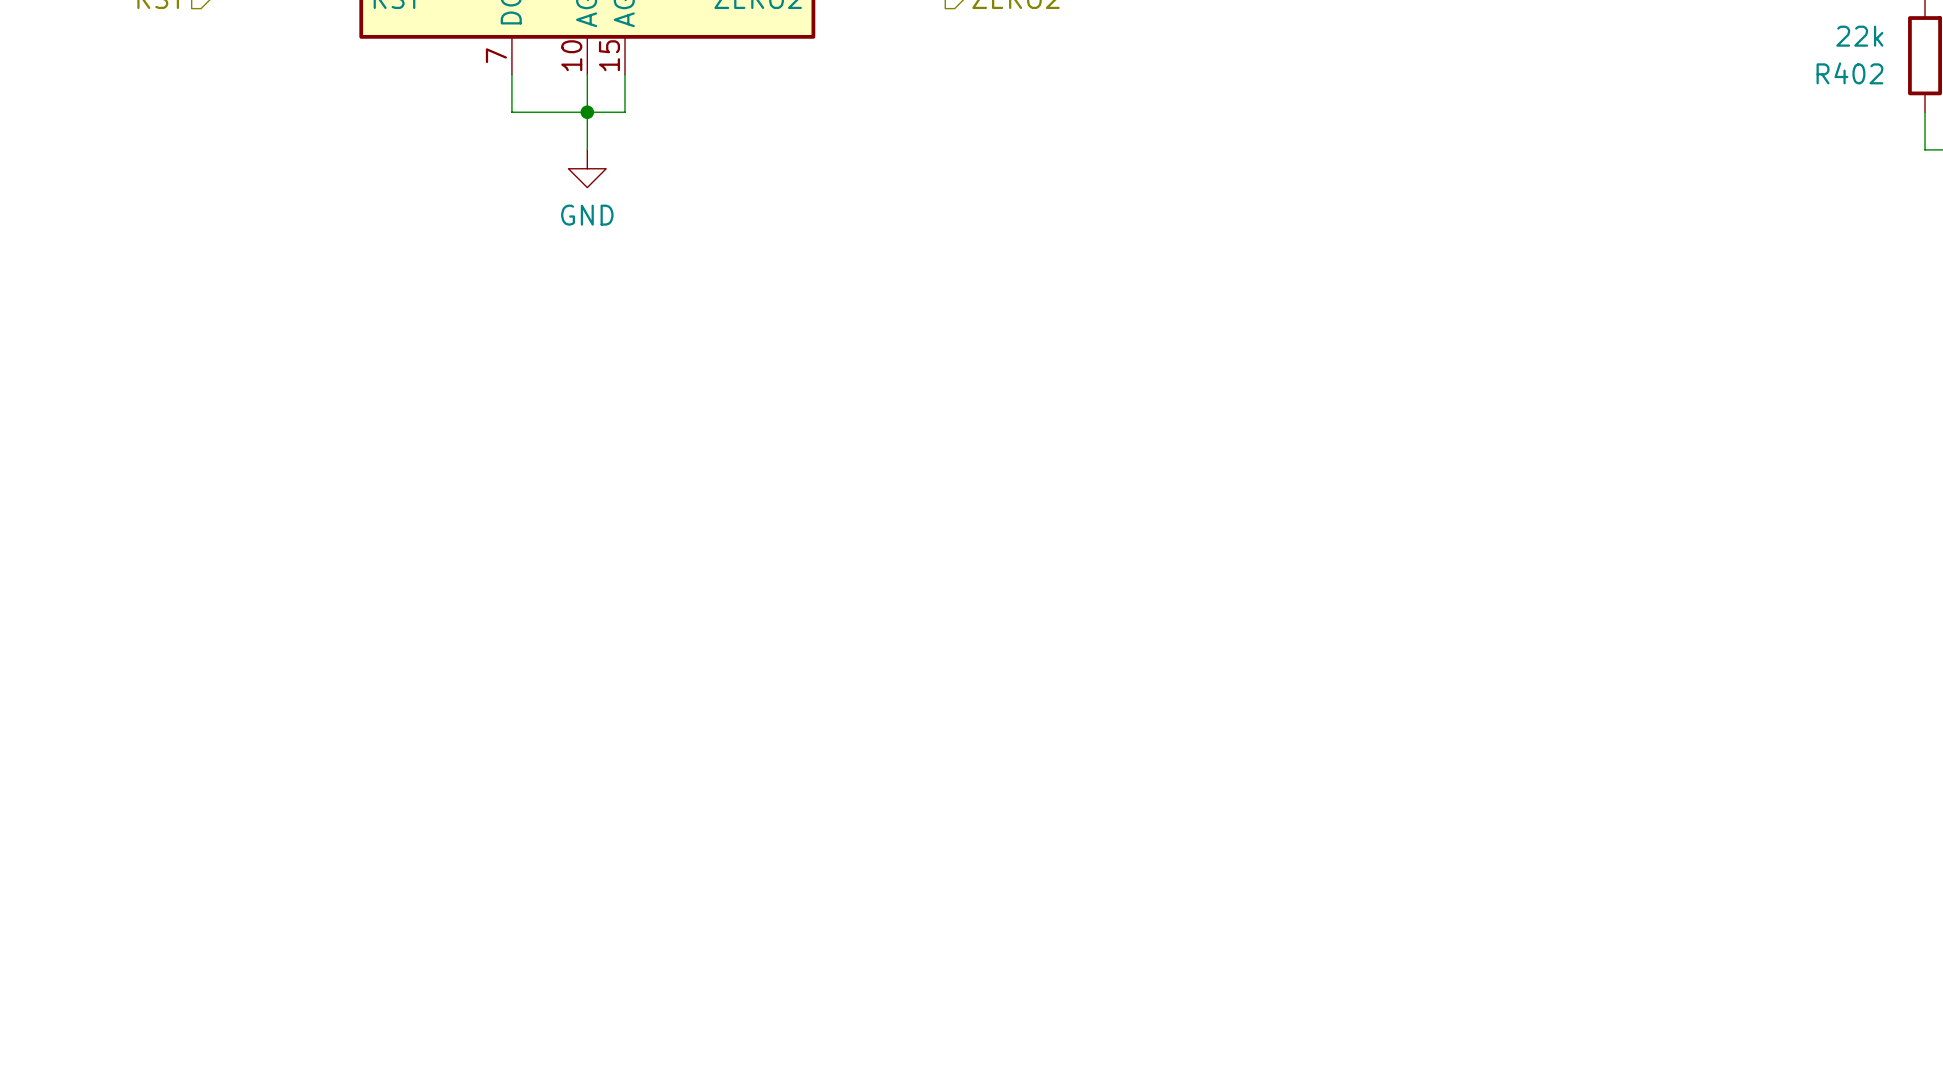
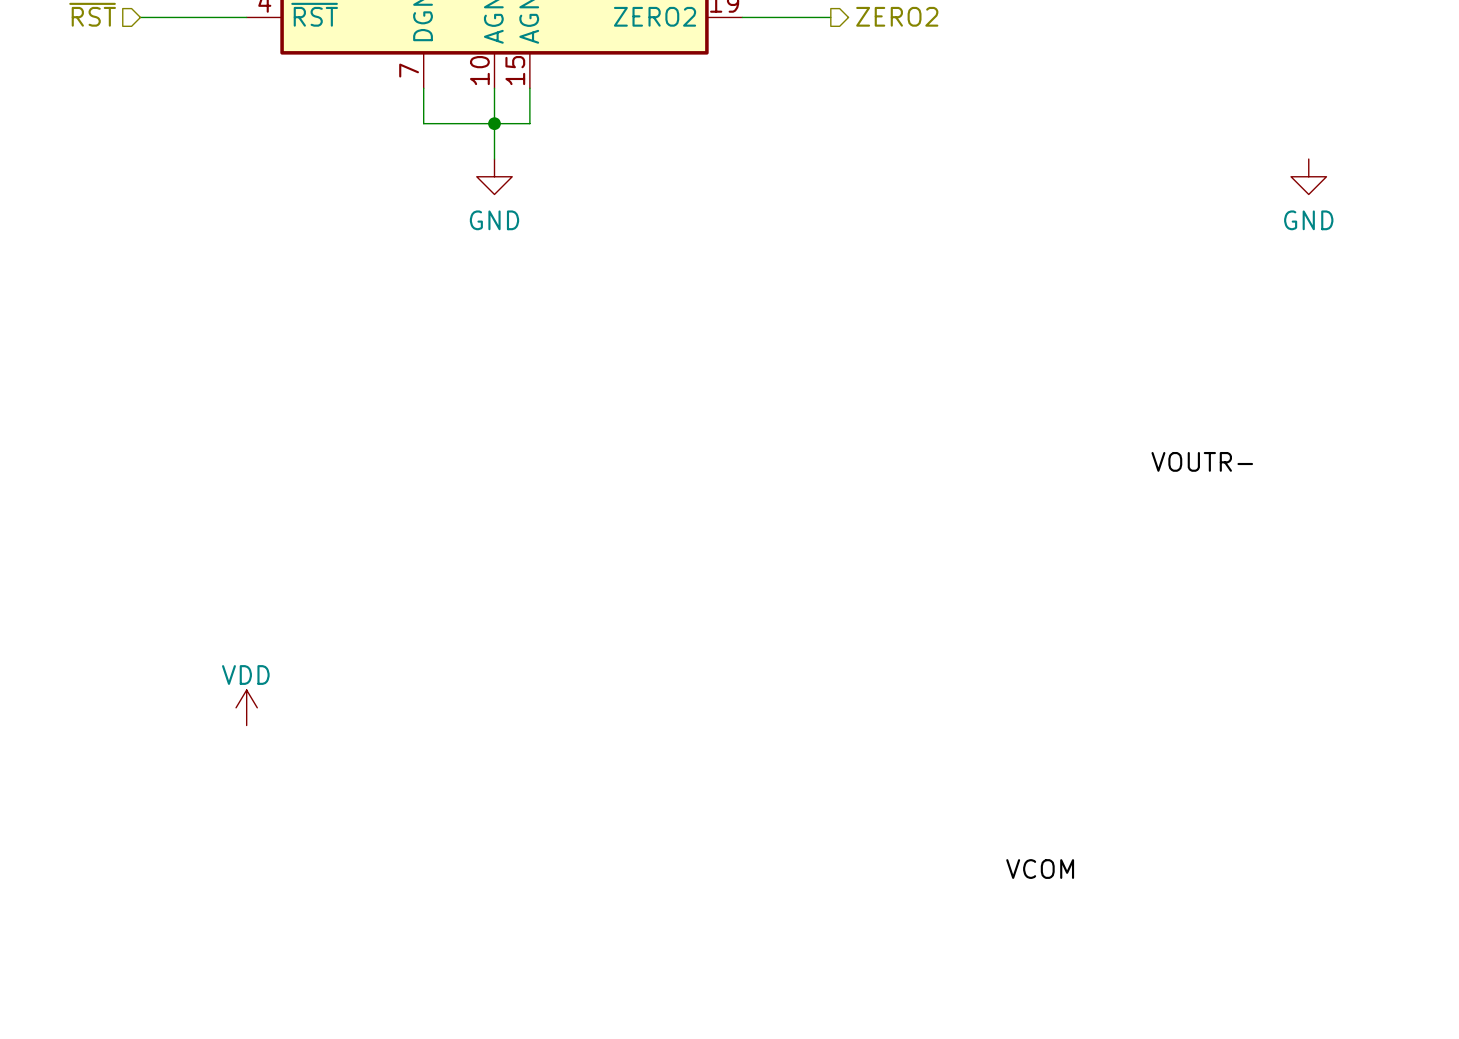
power symbol: none -> GND (1308, 176)
label: none -> VOUTR- (1202, 461)
power symbol: none -> VDD (246, 707)
label: none -> VCOM (1040, 869)

